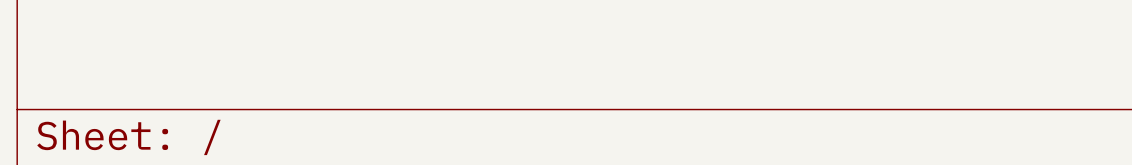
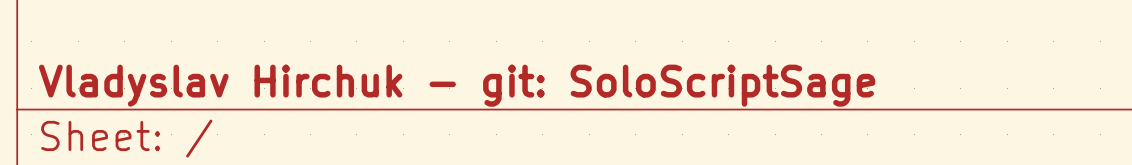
title block: none -> Vladyslav Hirchuk - git: SoloScriptSage (457, 85)

